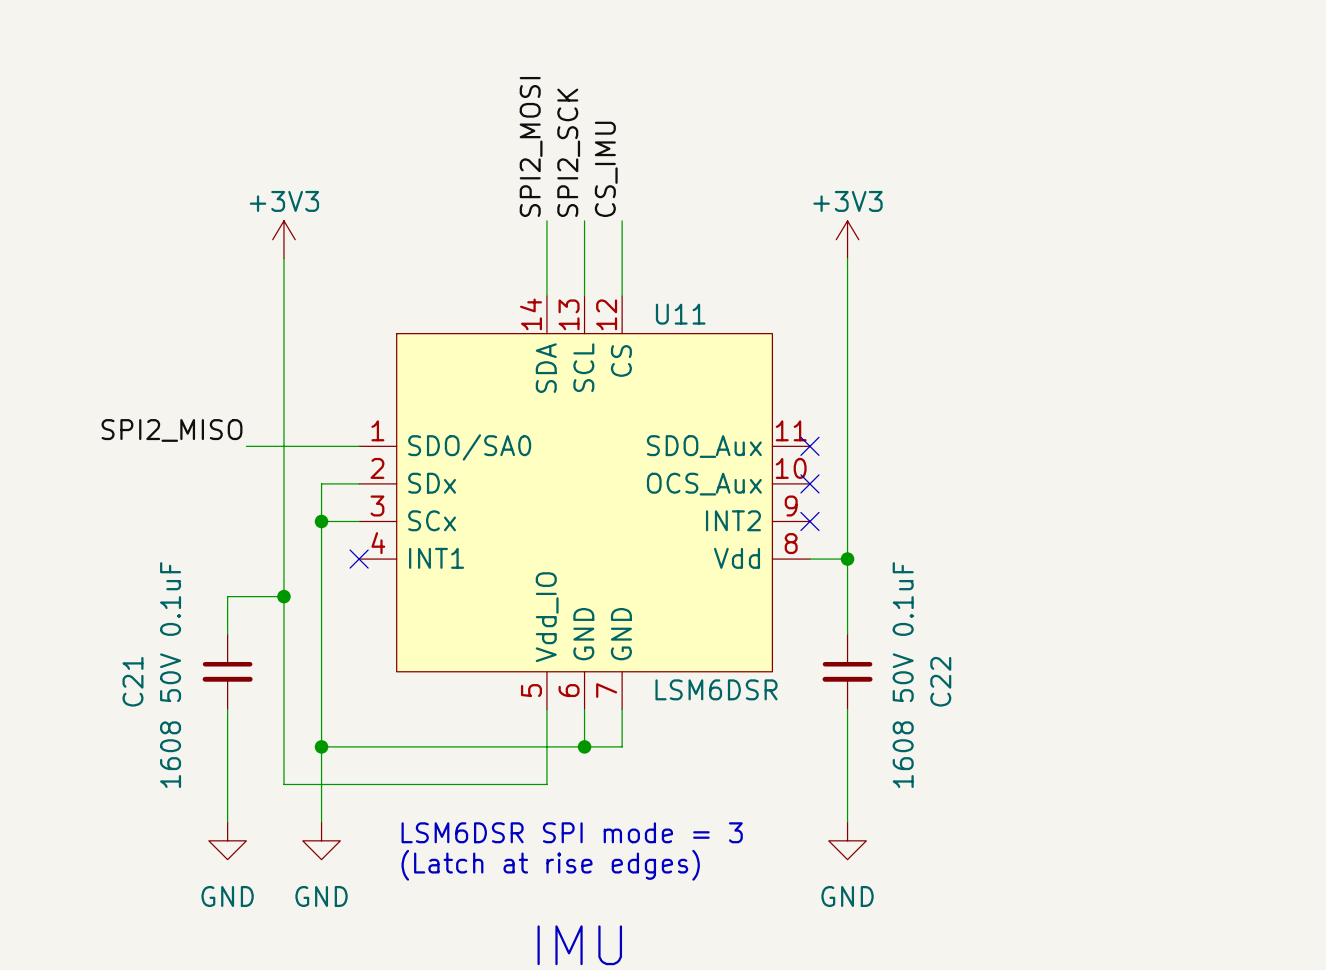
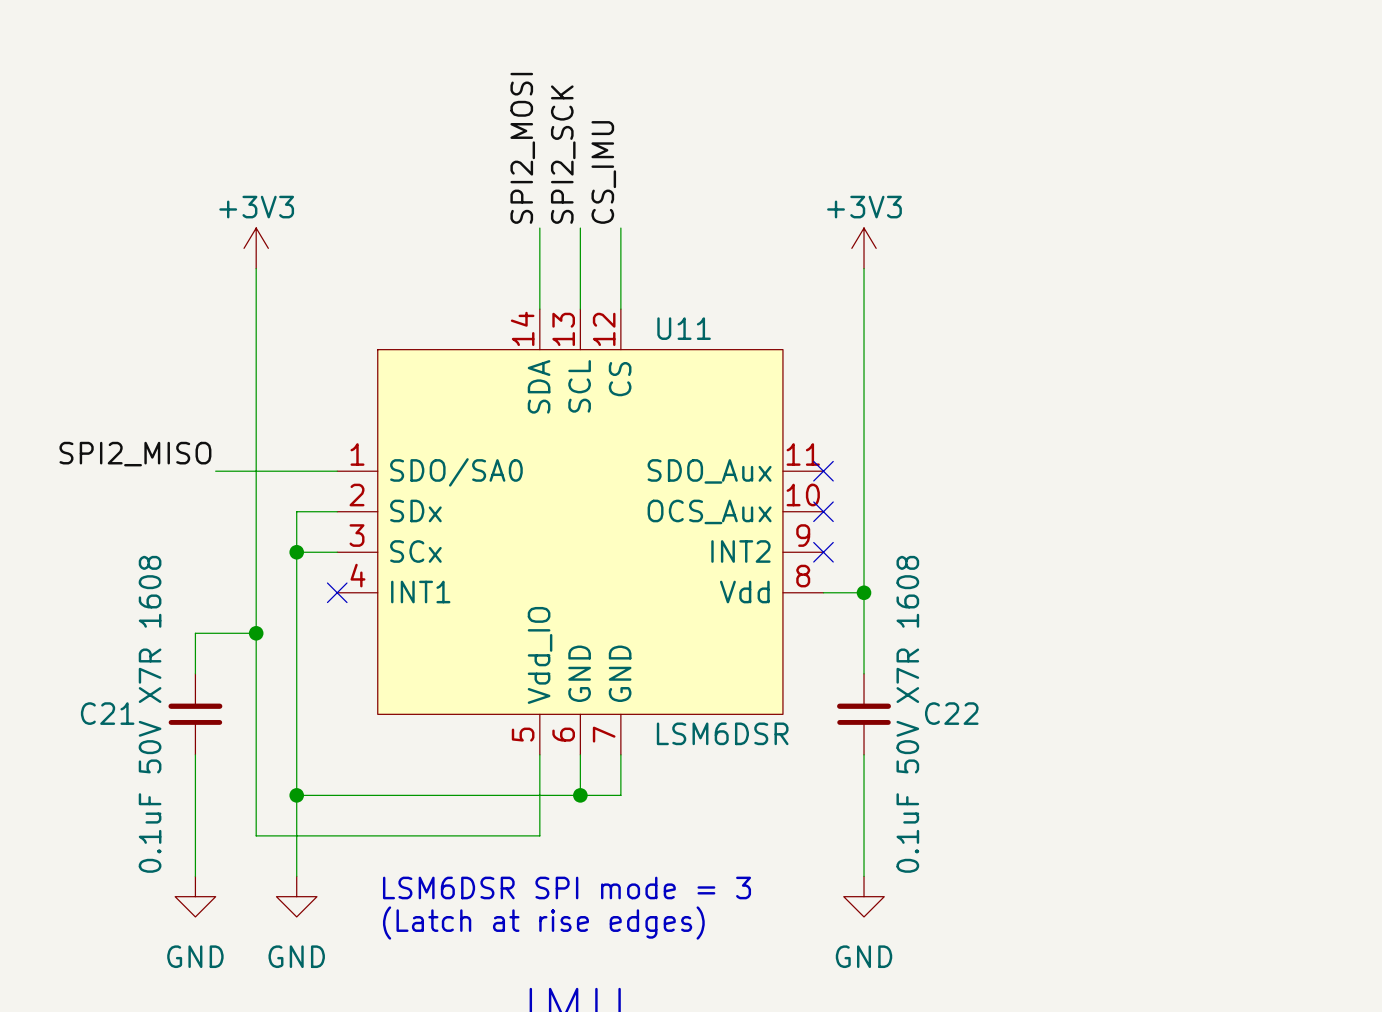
C21 text: none -> 0.1uF 50V X7R 1608 (150, 714)
C21 rotation: 0° (227, 671) -> 180° (195, 714)
C22 rotation: 0° (847, 671) -> 180° (864, 714)
C22 text: none -> 0.1uF 50V X7R 1608 (907, 714)
C21 value: 1608 50V 0.1uF (170, 675) -> none
C22 value: 1608 50V 0.1uF (903, 675) -> none

